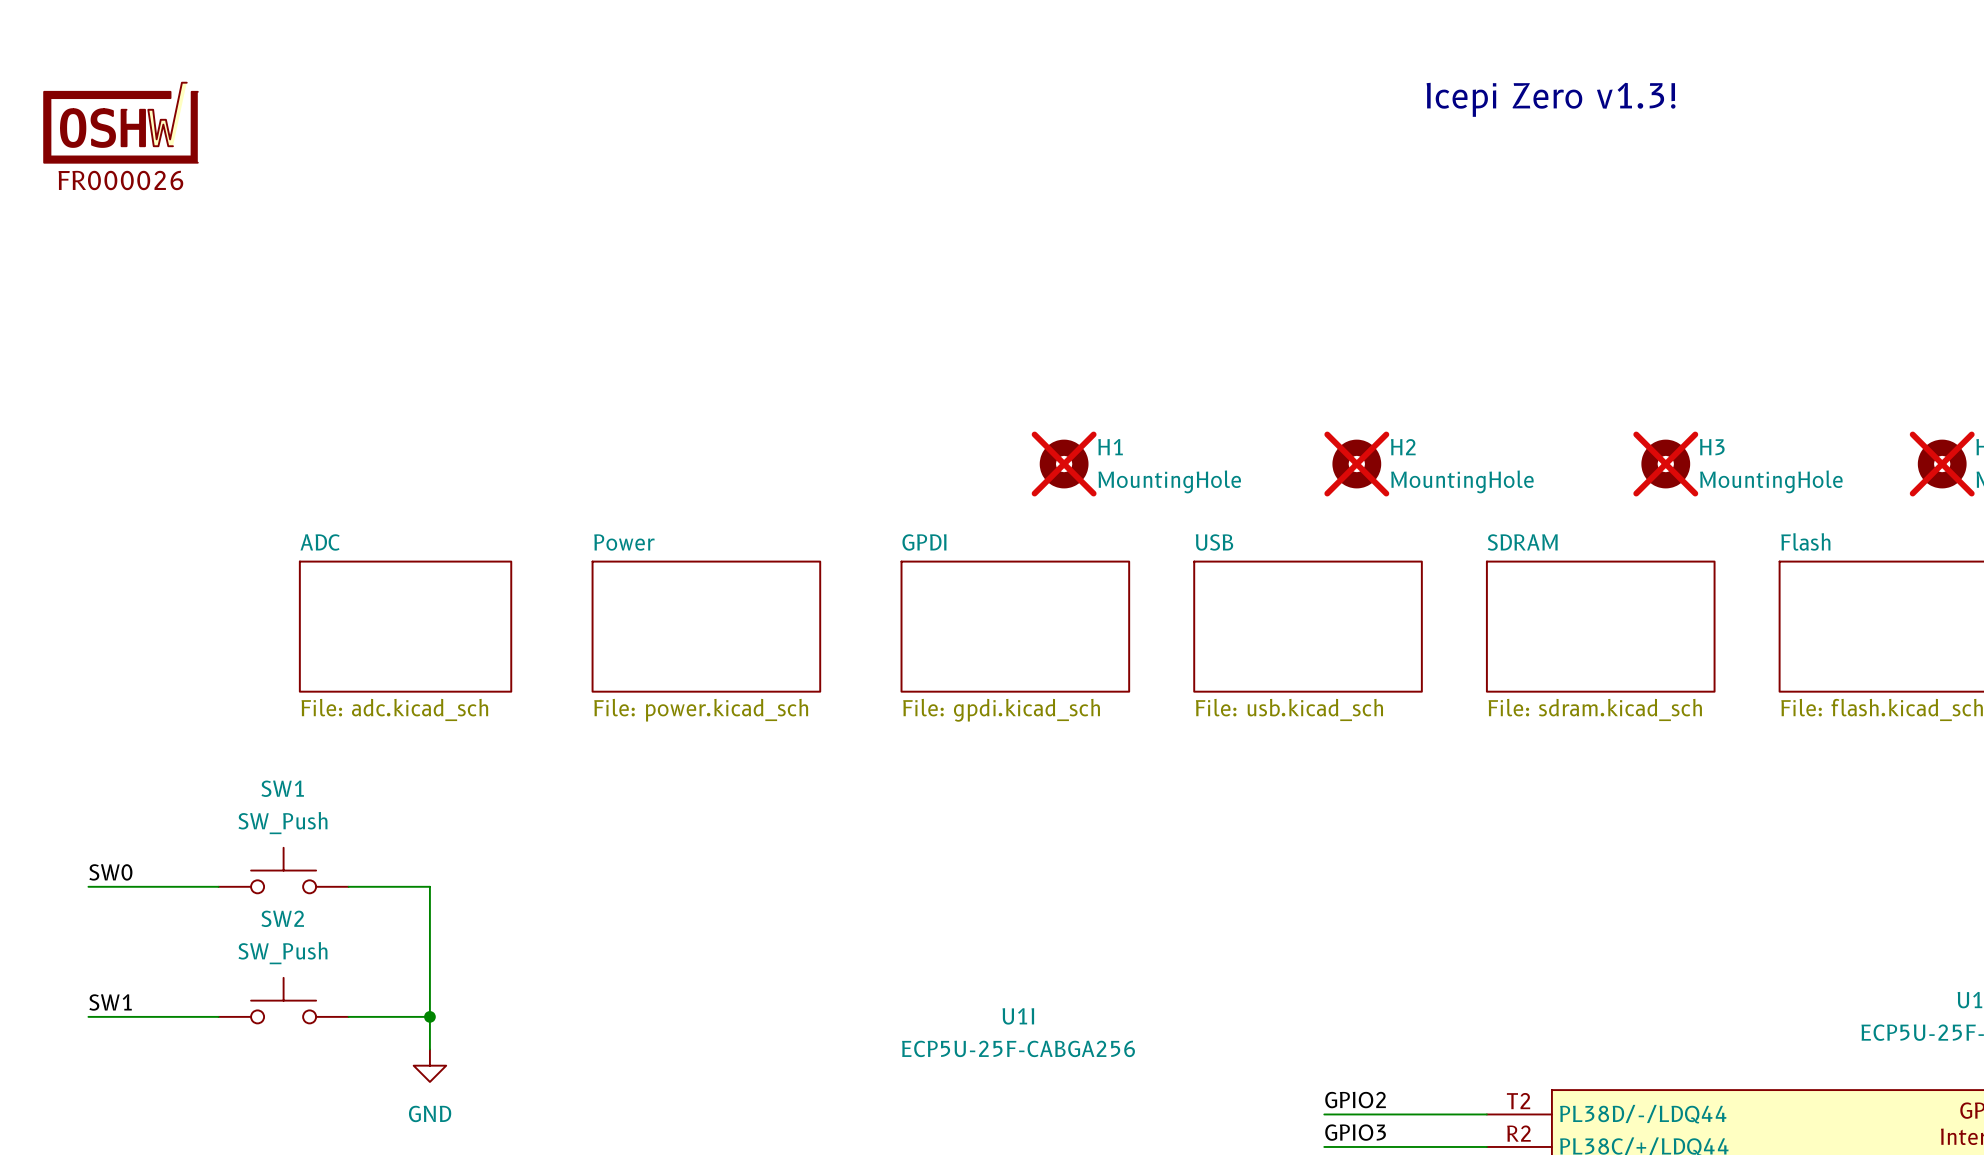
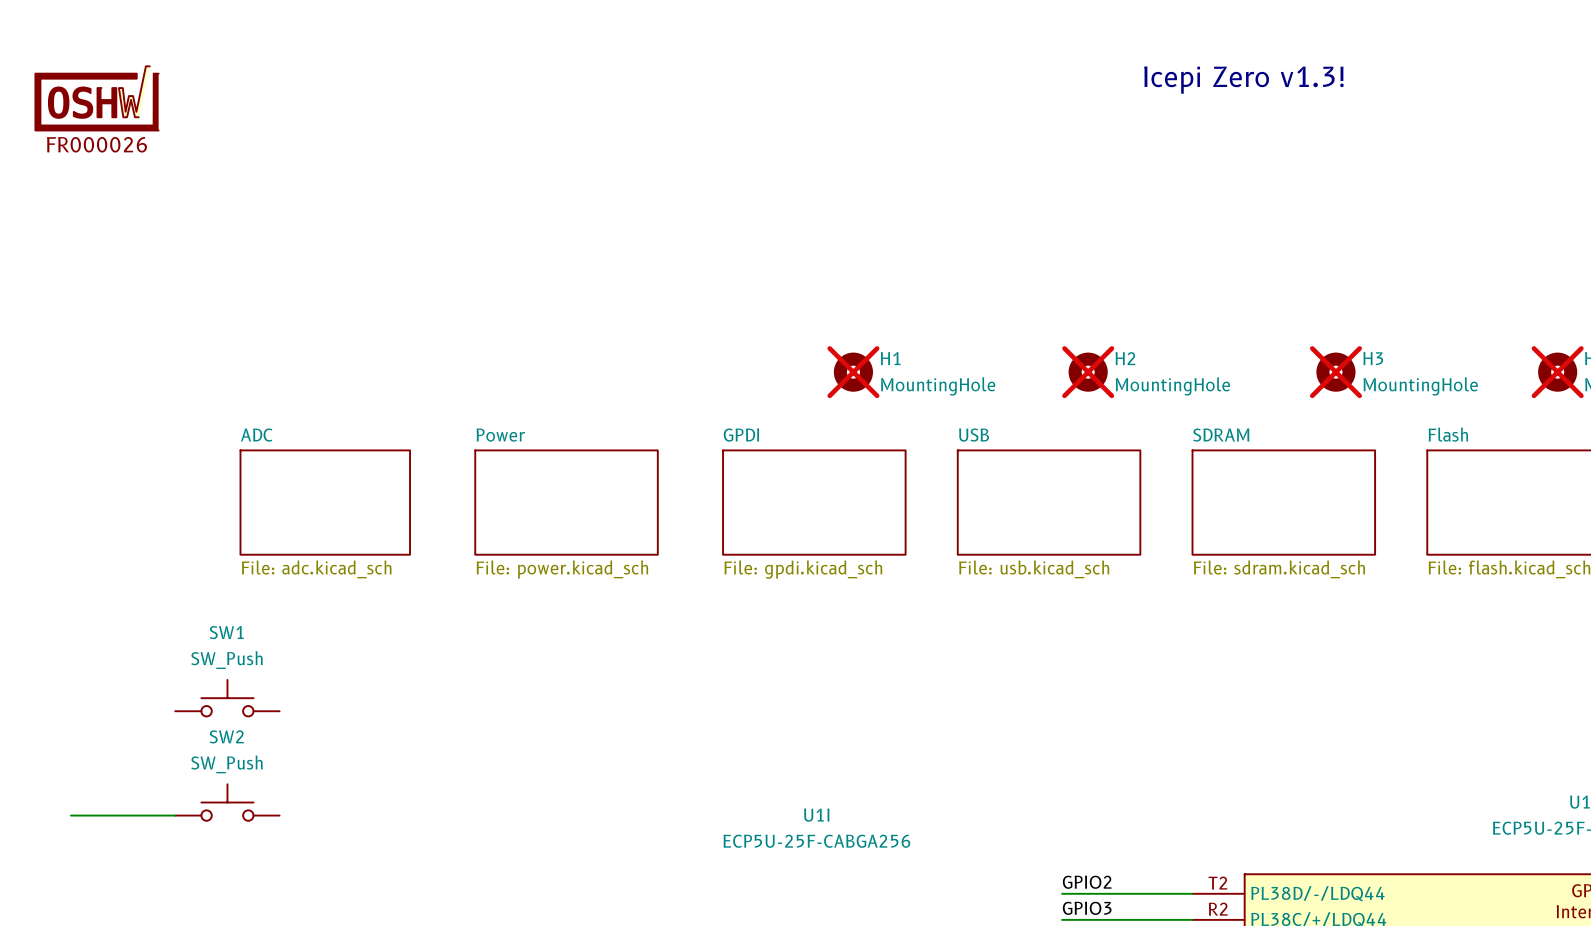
label: SW0 (110, 872) -> none
wire: (88, 886) (218, 886) -> none
wire: (348, 886) (429, 886) (429, 1049) -> none
label: SW1 (110, 1002) -> none
wire: (348, 1016) (429, 1016) -> none
junction: (429, 1016) -> none
power symbol: GND (429, 1065) -> none

